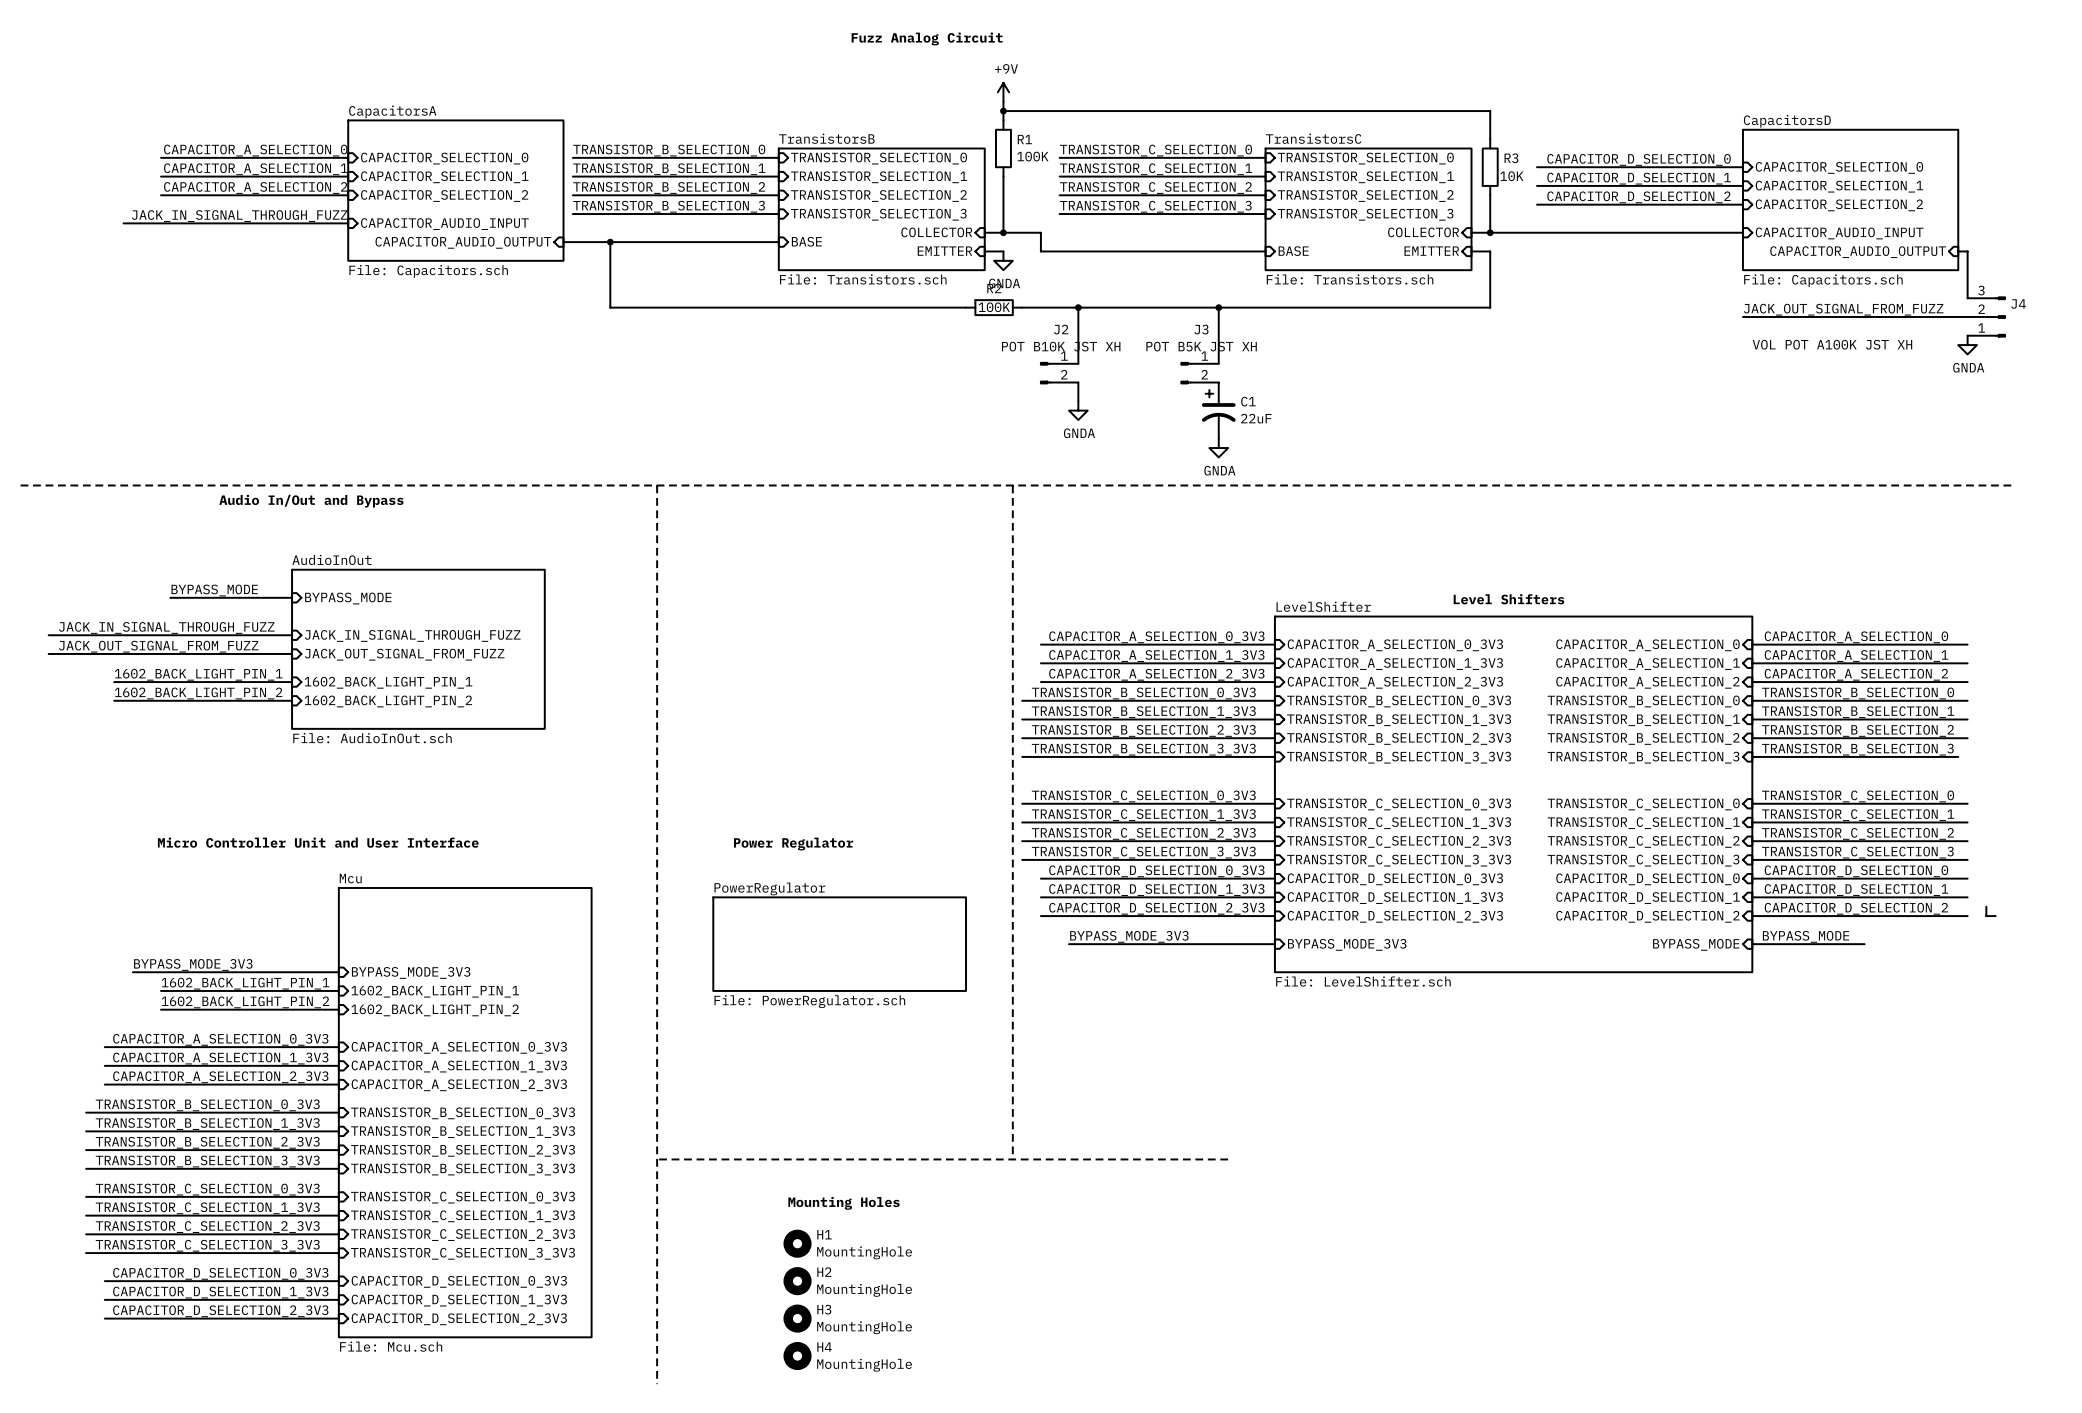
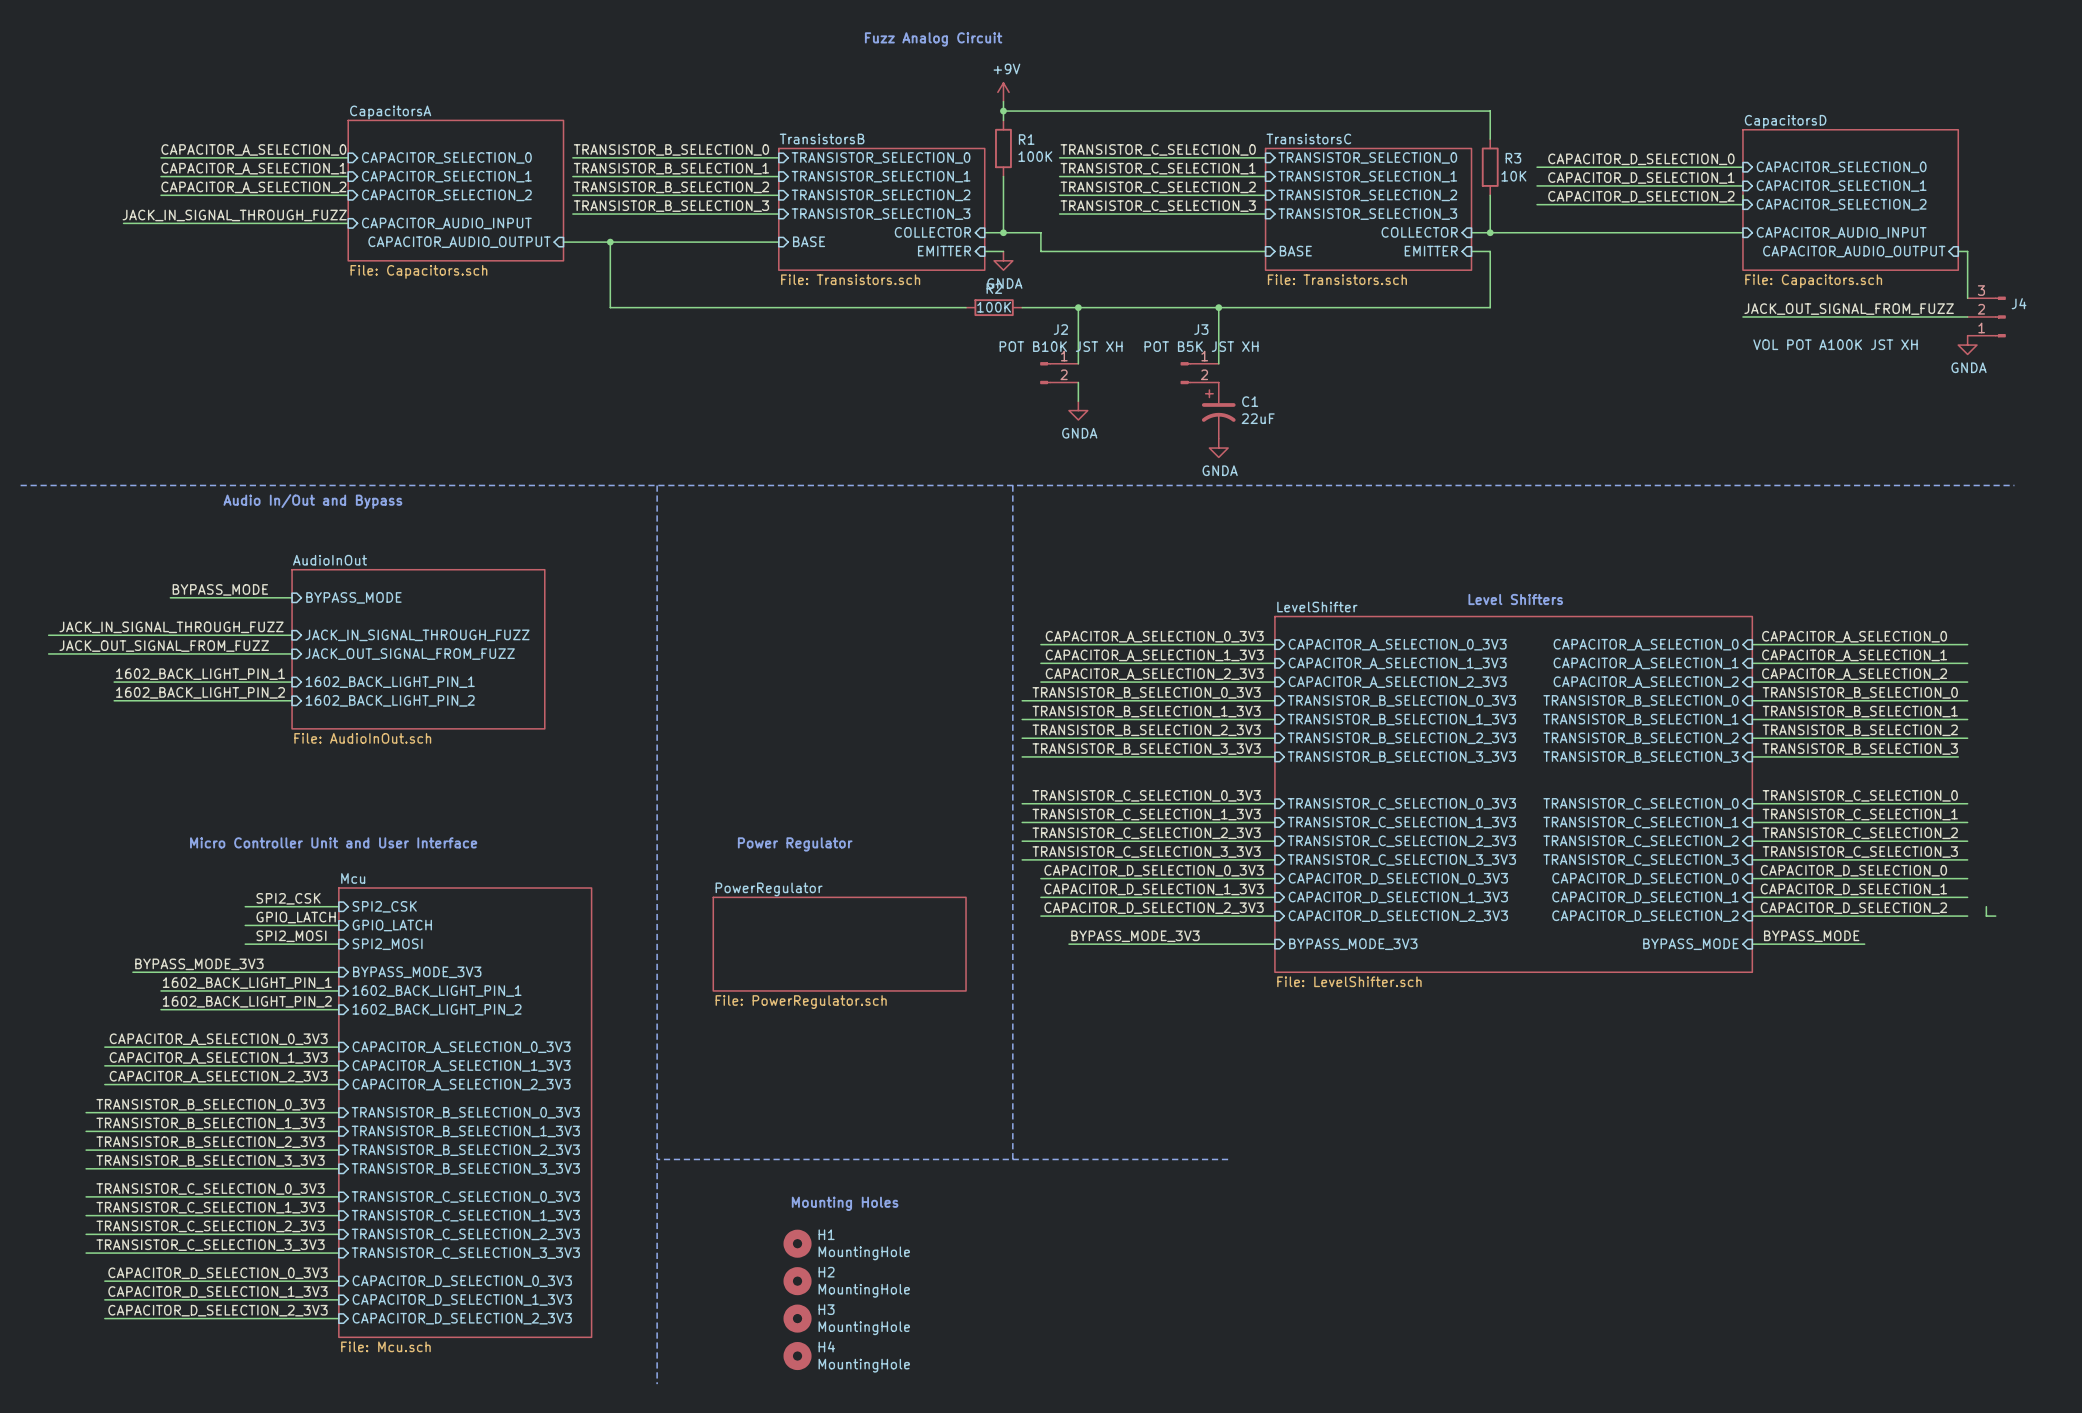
label: none -> SPI2_CSK (288, 898)
wire: none -> (245, 906) (338, 906)
sheet pin: none -> SPI2_CSK (384, 906)
label: none -> GPIO_LATCH (296, 917)
wire: none -> (245, 925) (338, 925)
sheet pin: none -> GPIO_LATCH (392, 925)
label: none -> SPI2_MOSI (291, 936)
wire: none -> (245, 944) (338, 944)
sheet pin: none -> SPI2_MOSI (387, 944)

